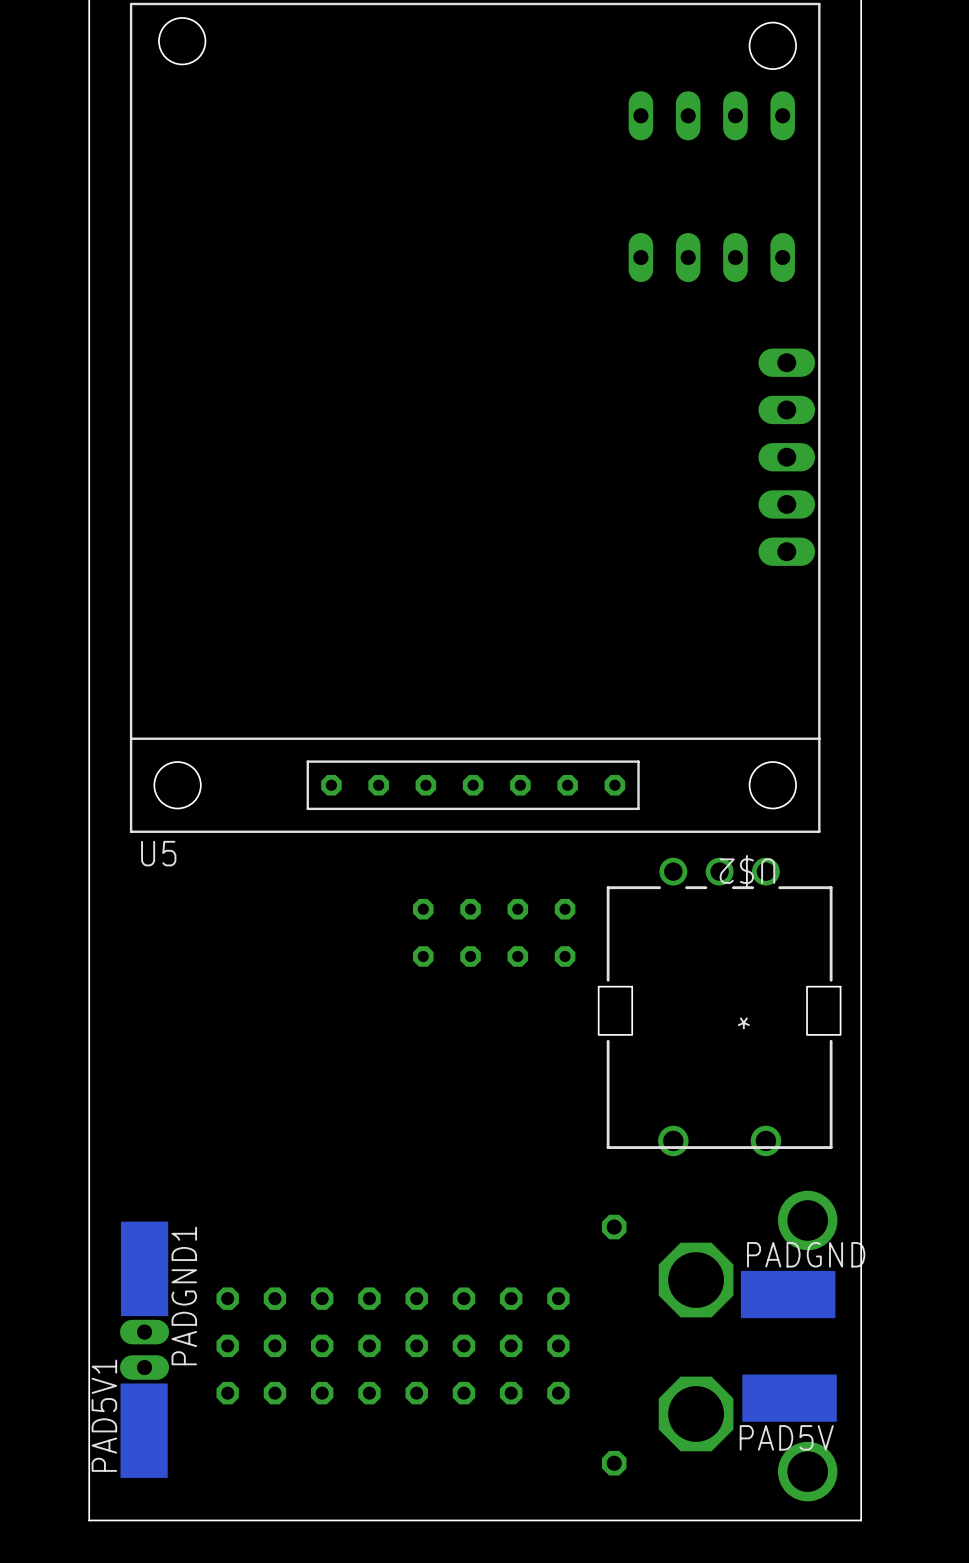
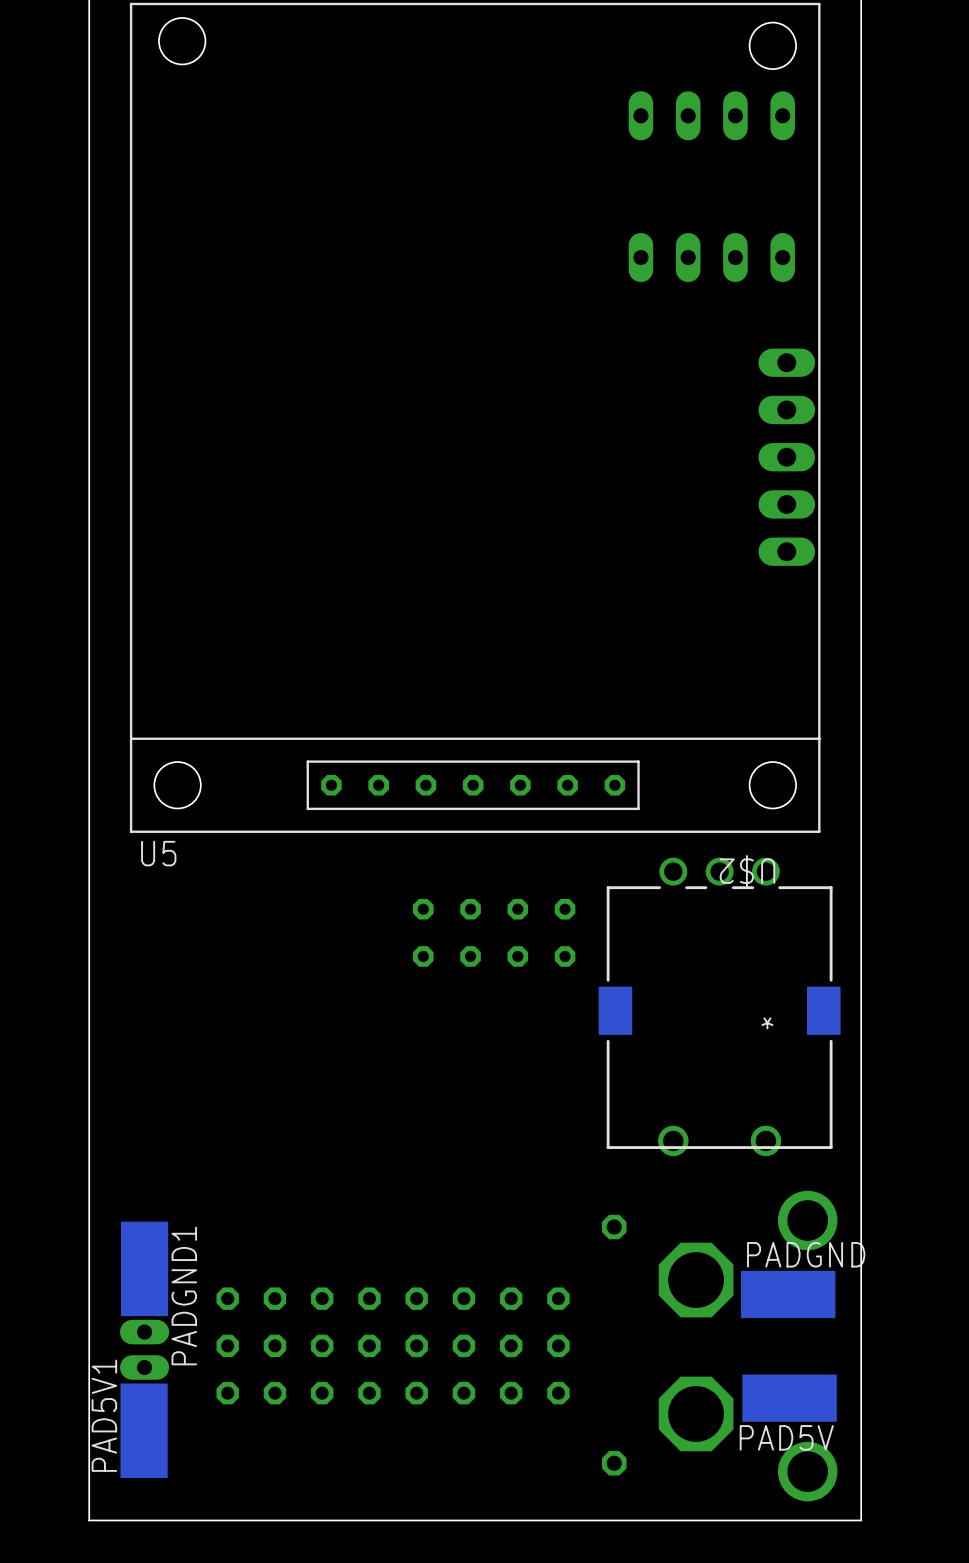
U$2 footprint: [598, 857, 841, 1157] -> [598, 857, 841, 1157]

